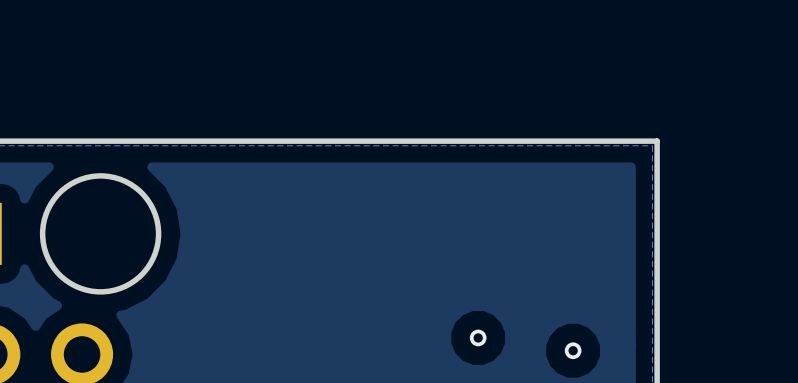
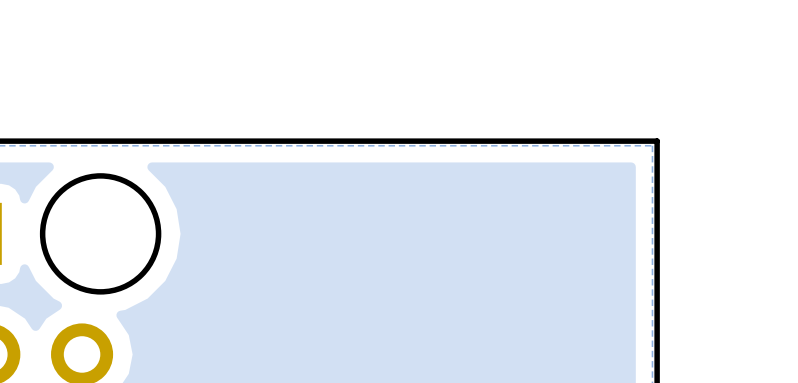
via: (478, 337) -> none
via: (573, 350) -> none

